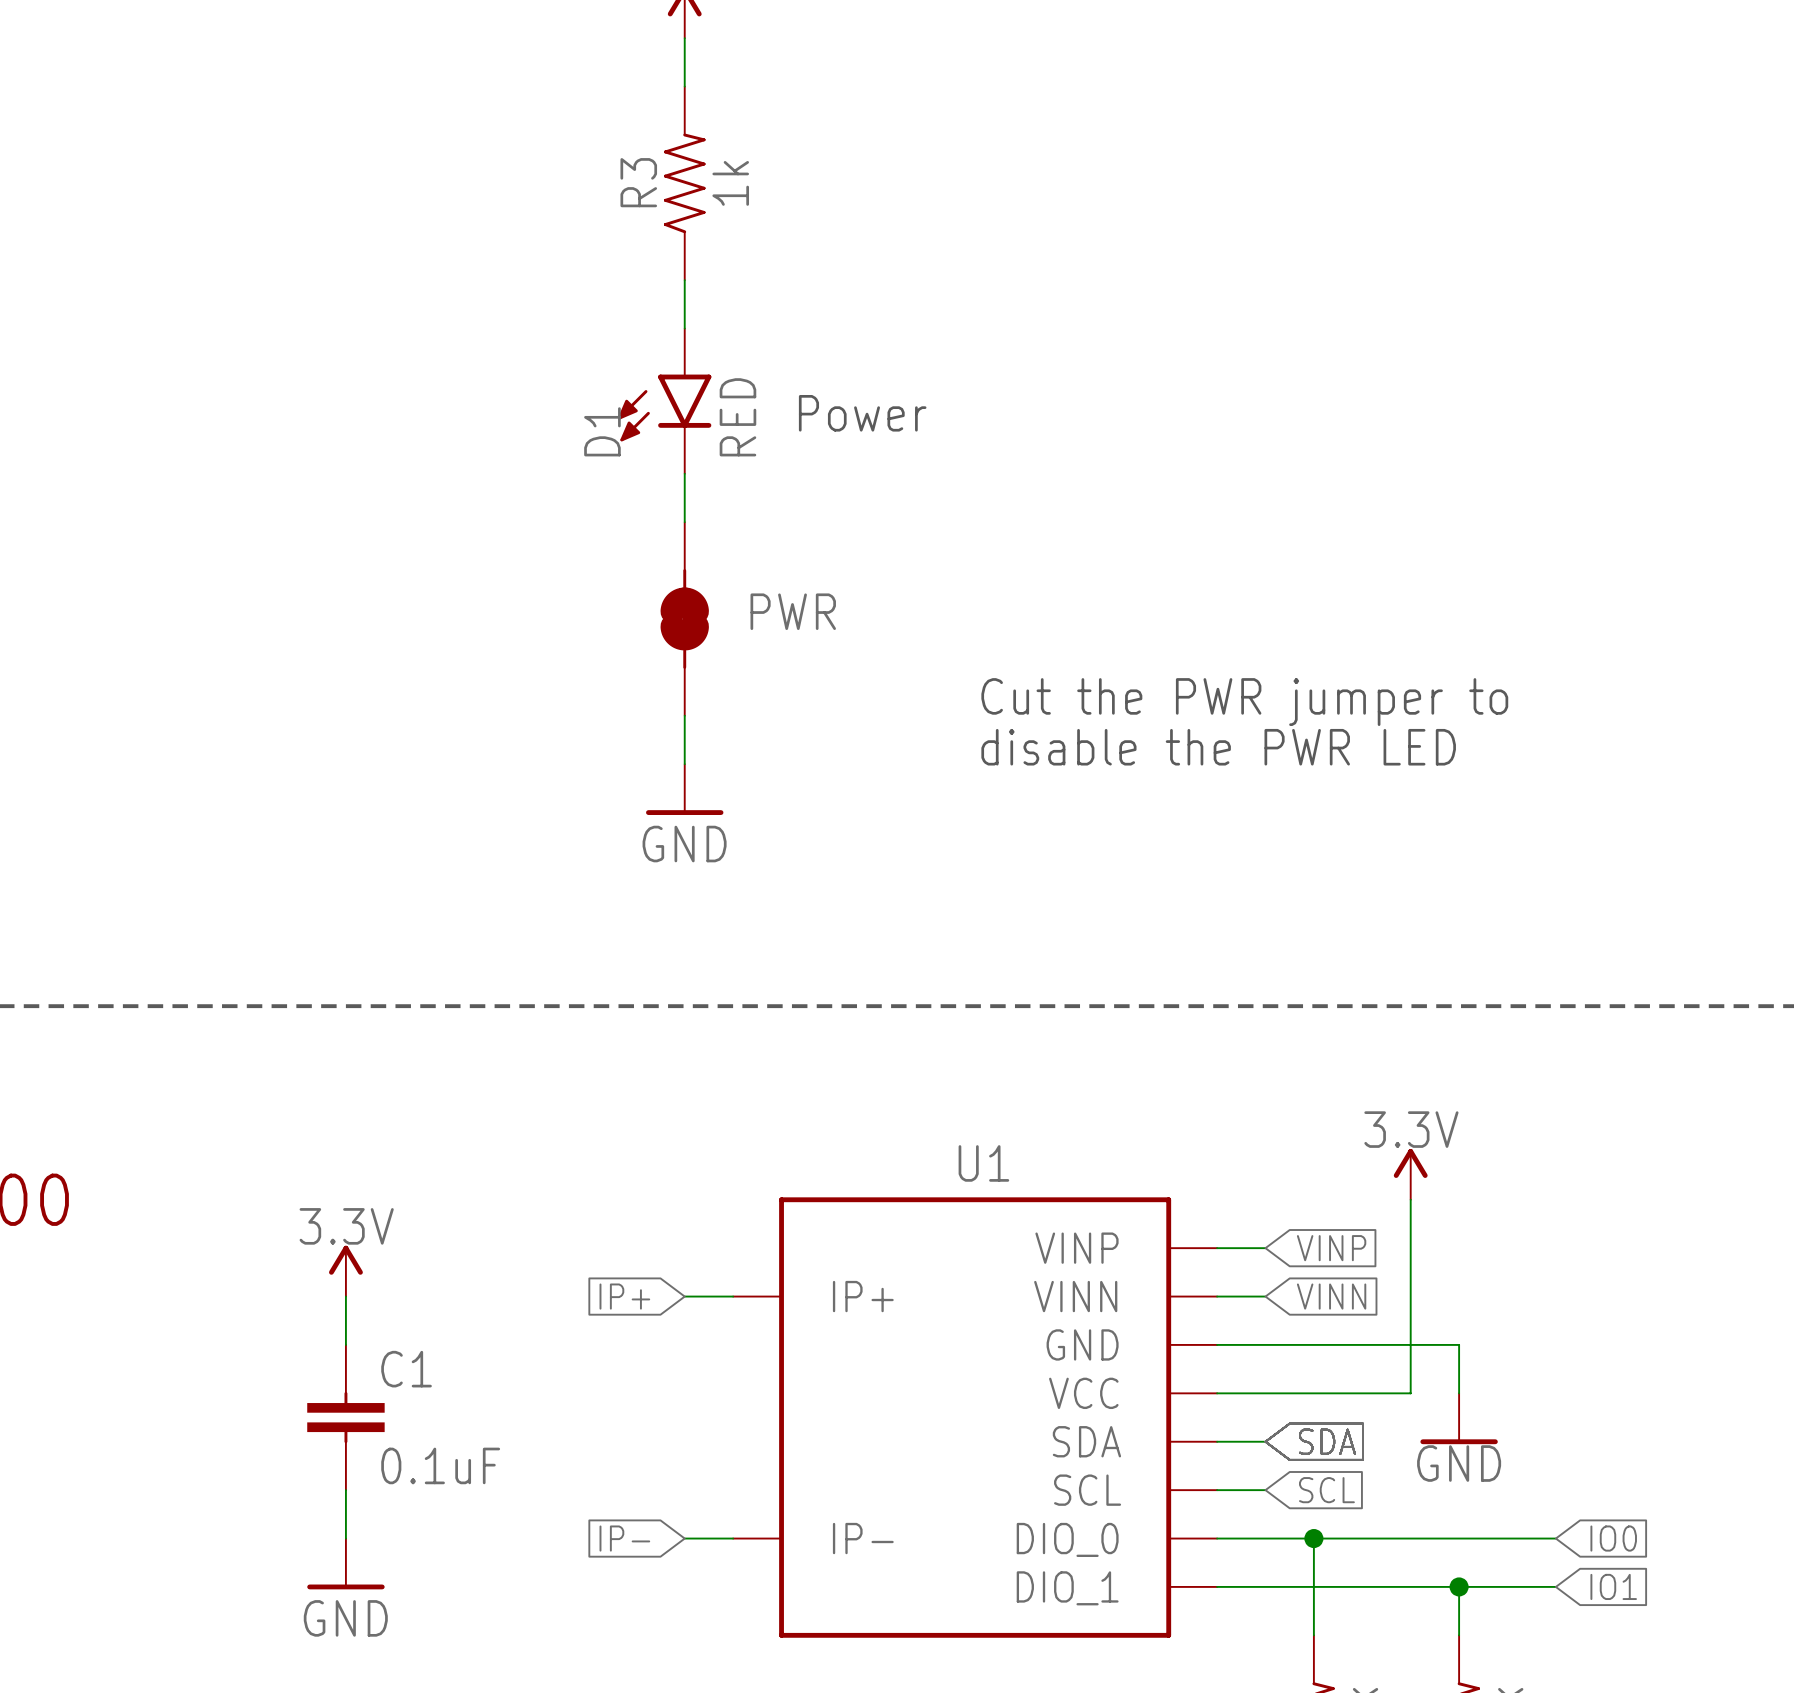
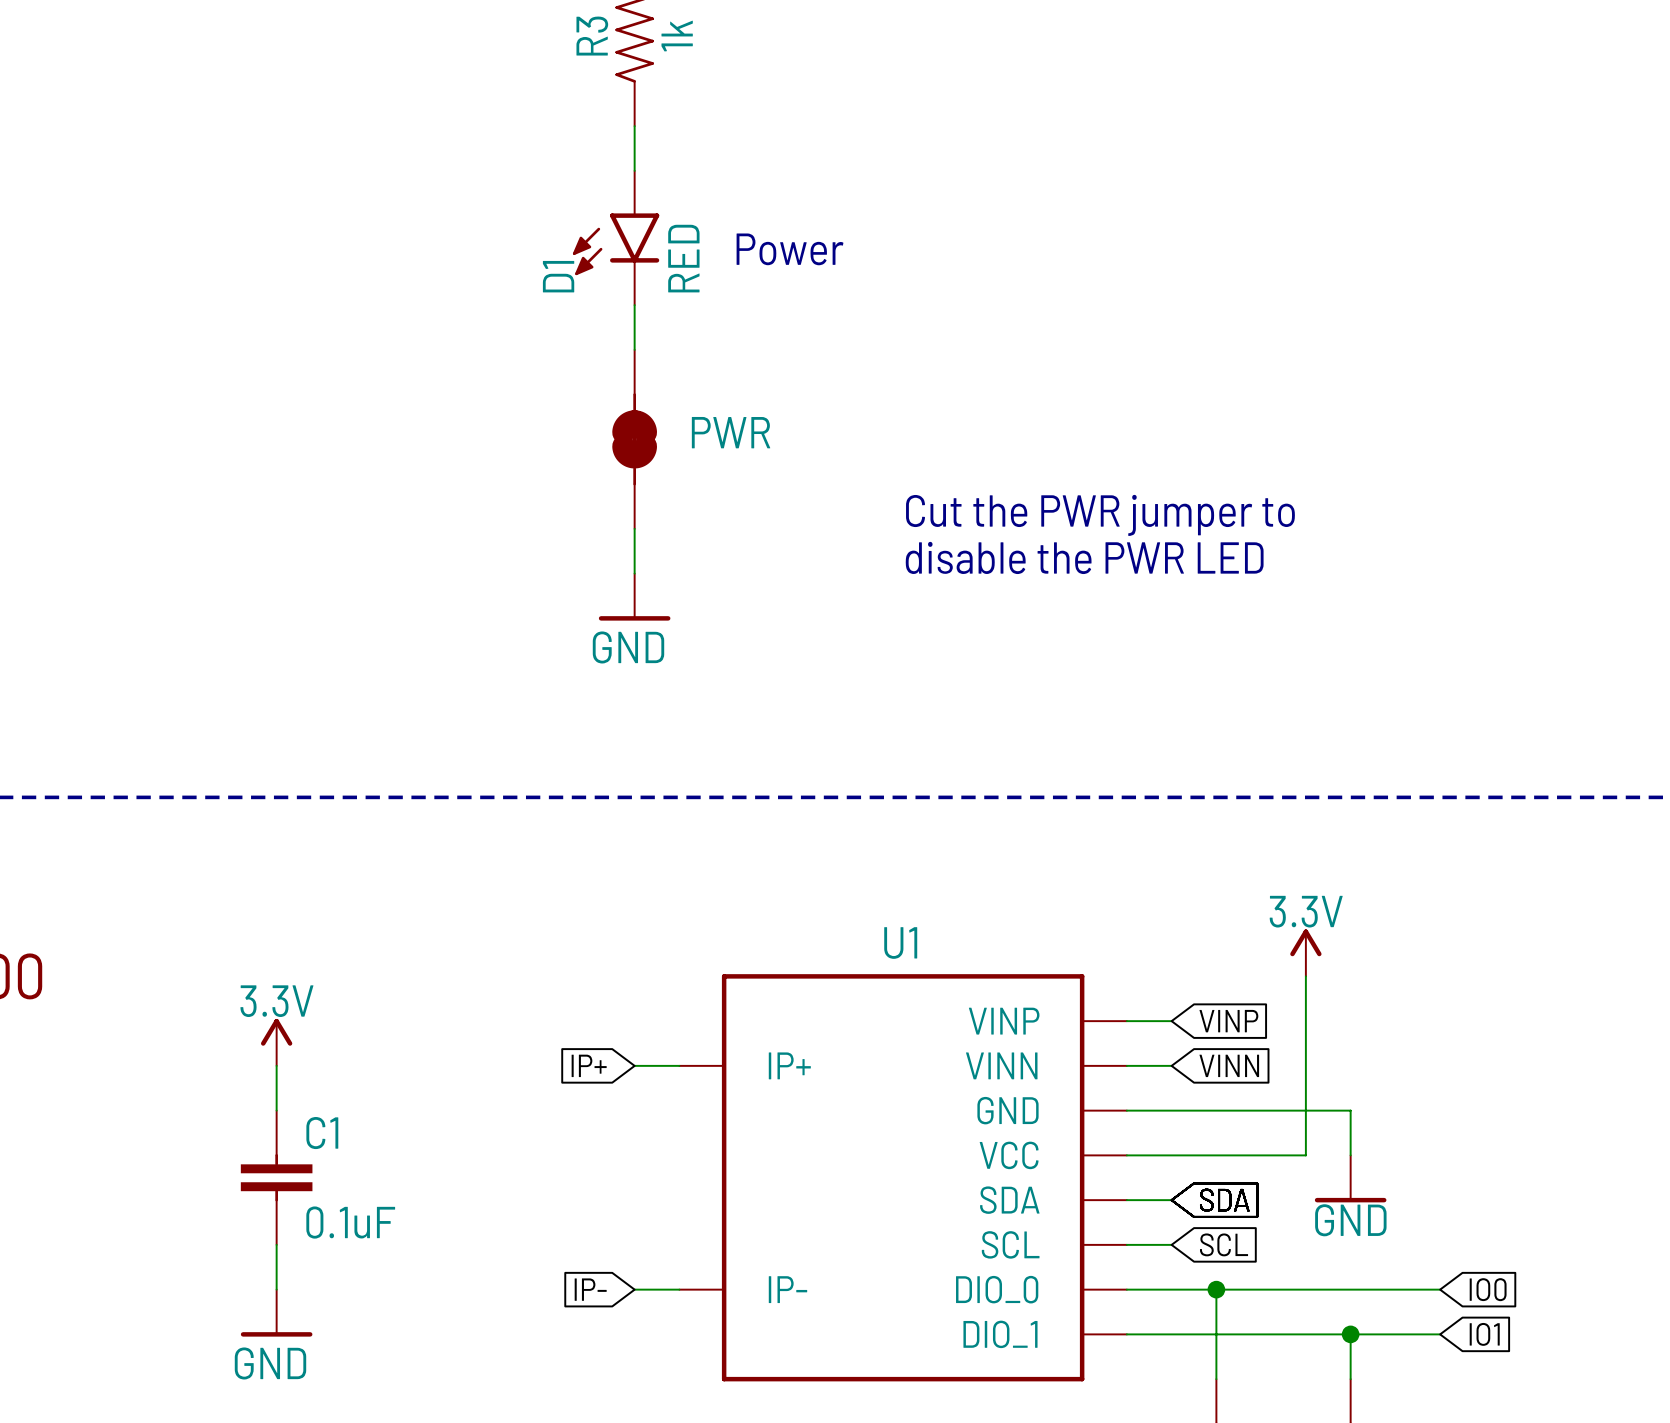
power symbol position: 3.3V (345, 1271) -> 3.3V (276, 1042)
wire: (345, 1296) (345, 1344) -> (276, 1065) (276, 1110)
C1 position: (345, 1417) -> (276, 1177)
wire: (345, 1490) (345, 1538) -> (276, 1244) (276, 1289)
power symbol position: GND (345, 1563) -> GND (276, 1313)

